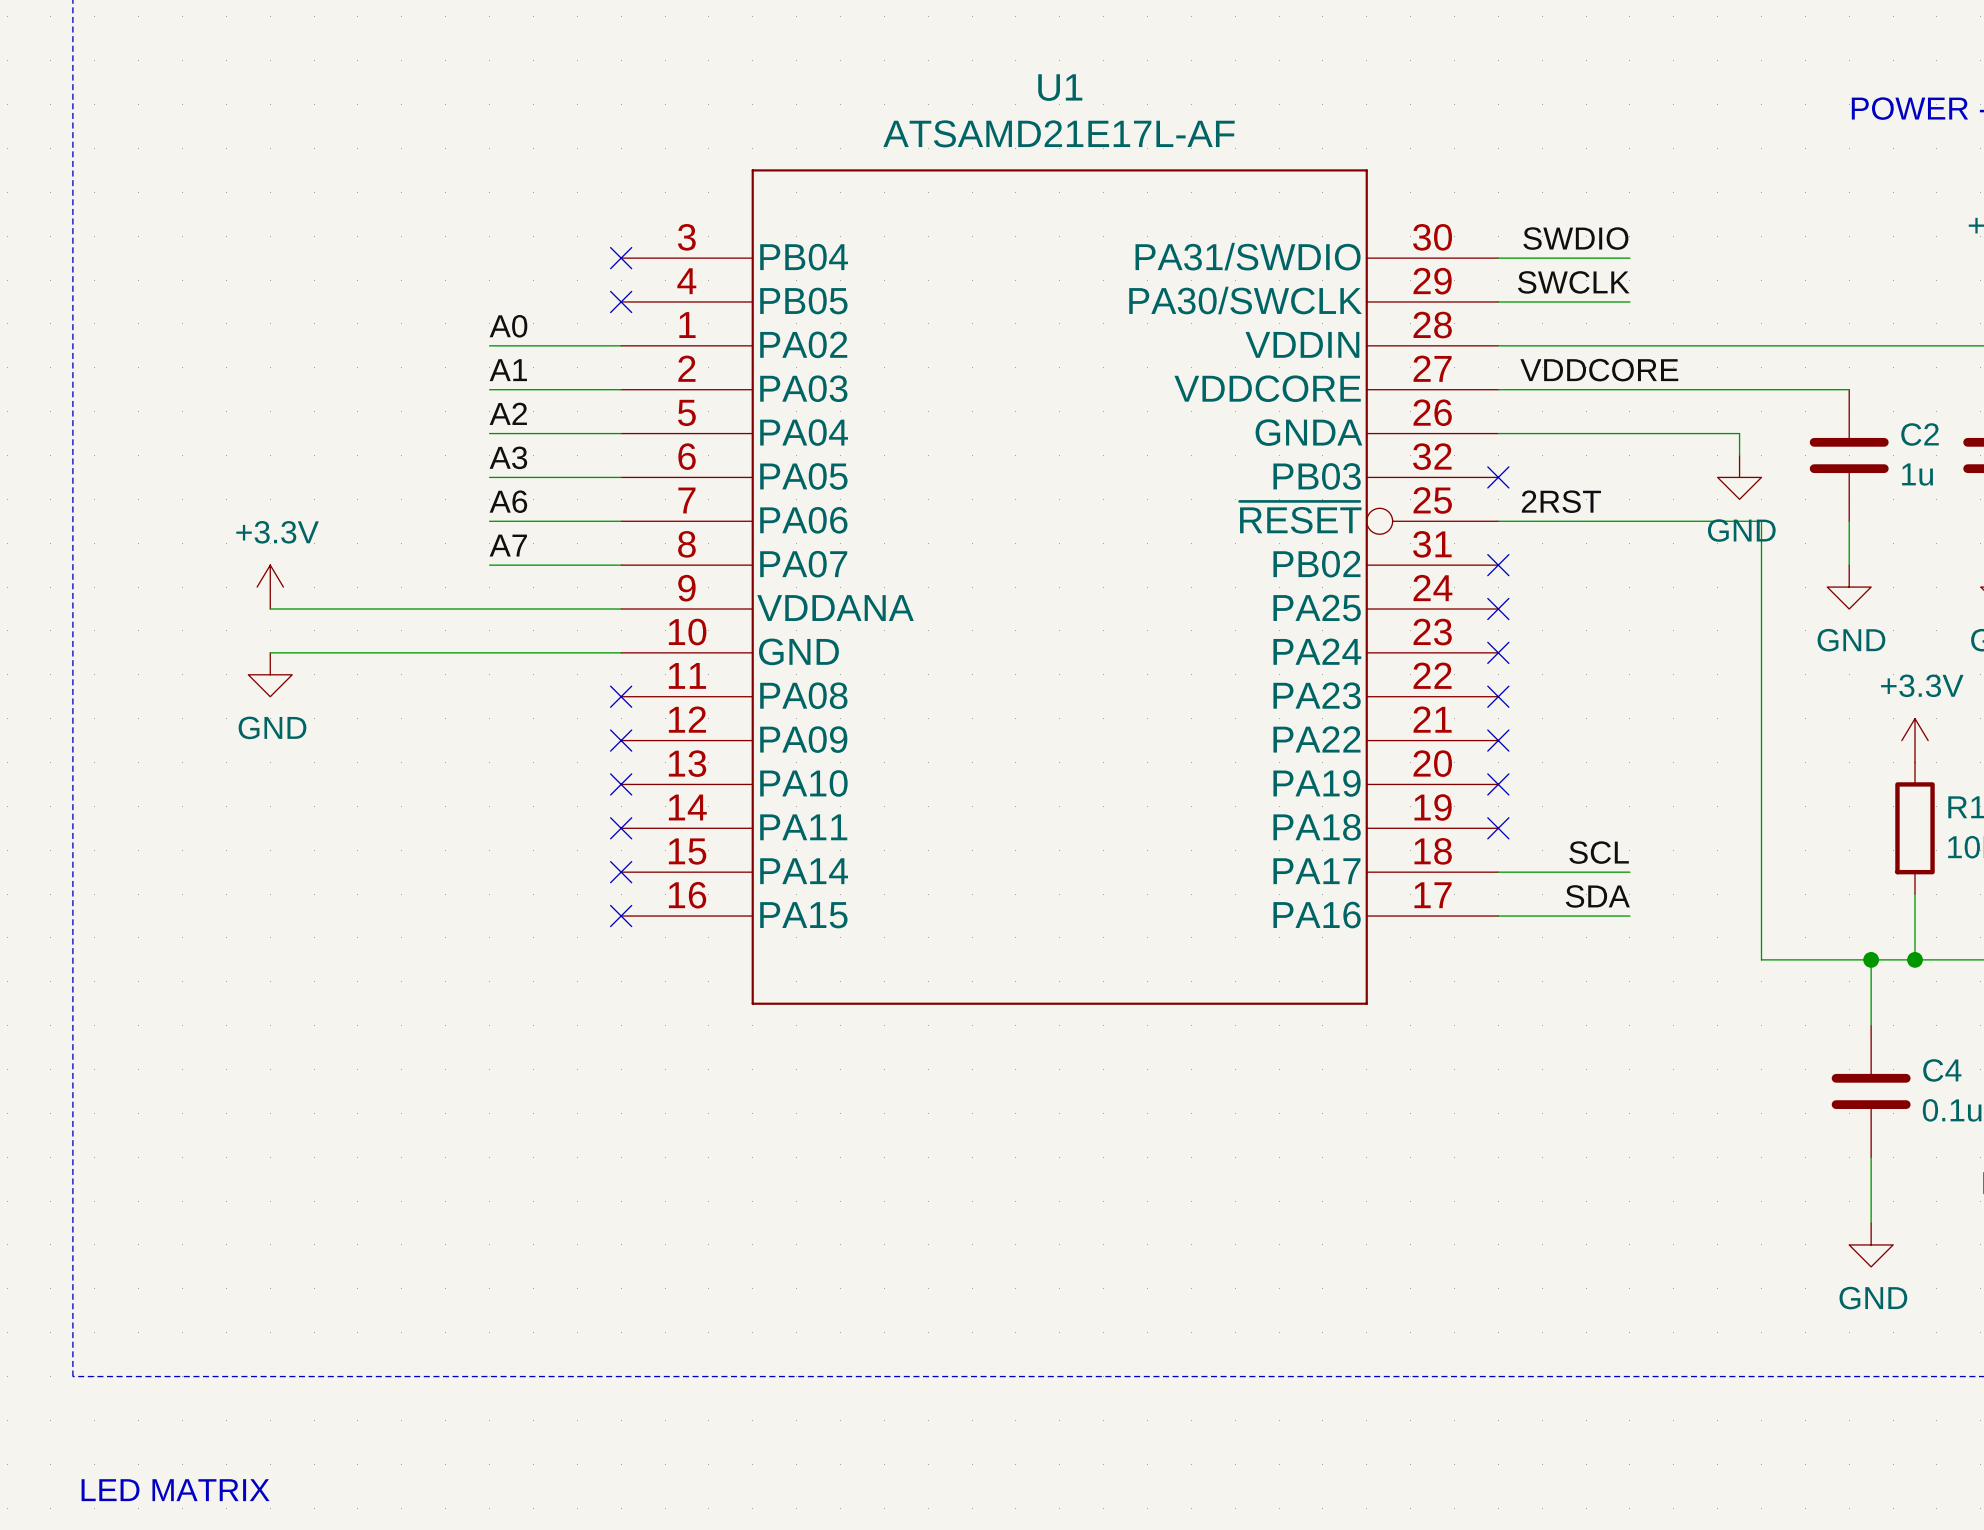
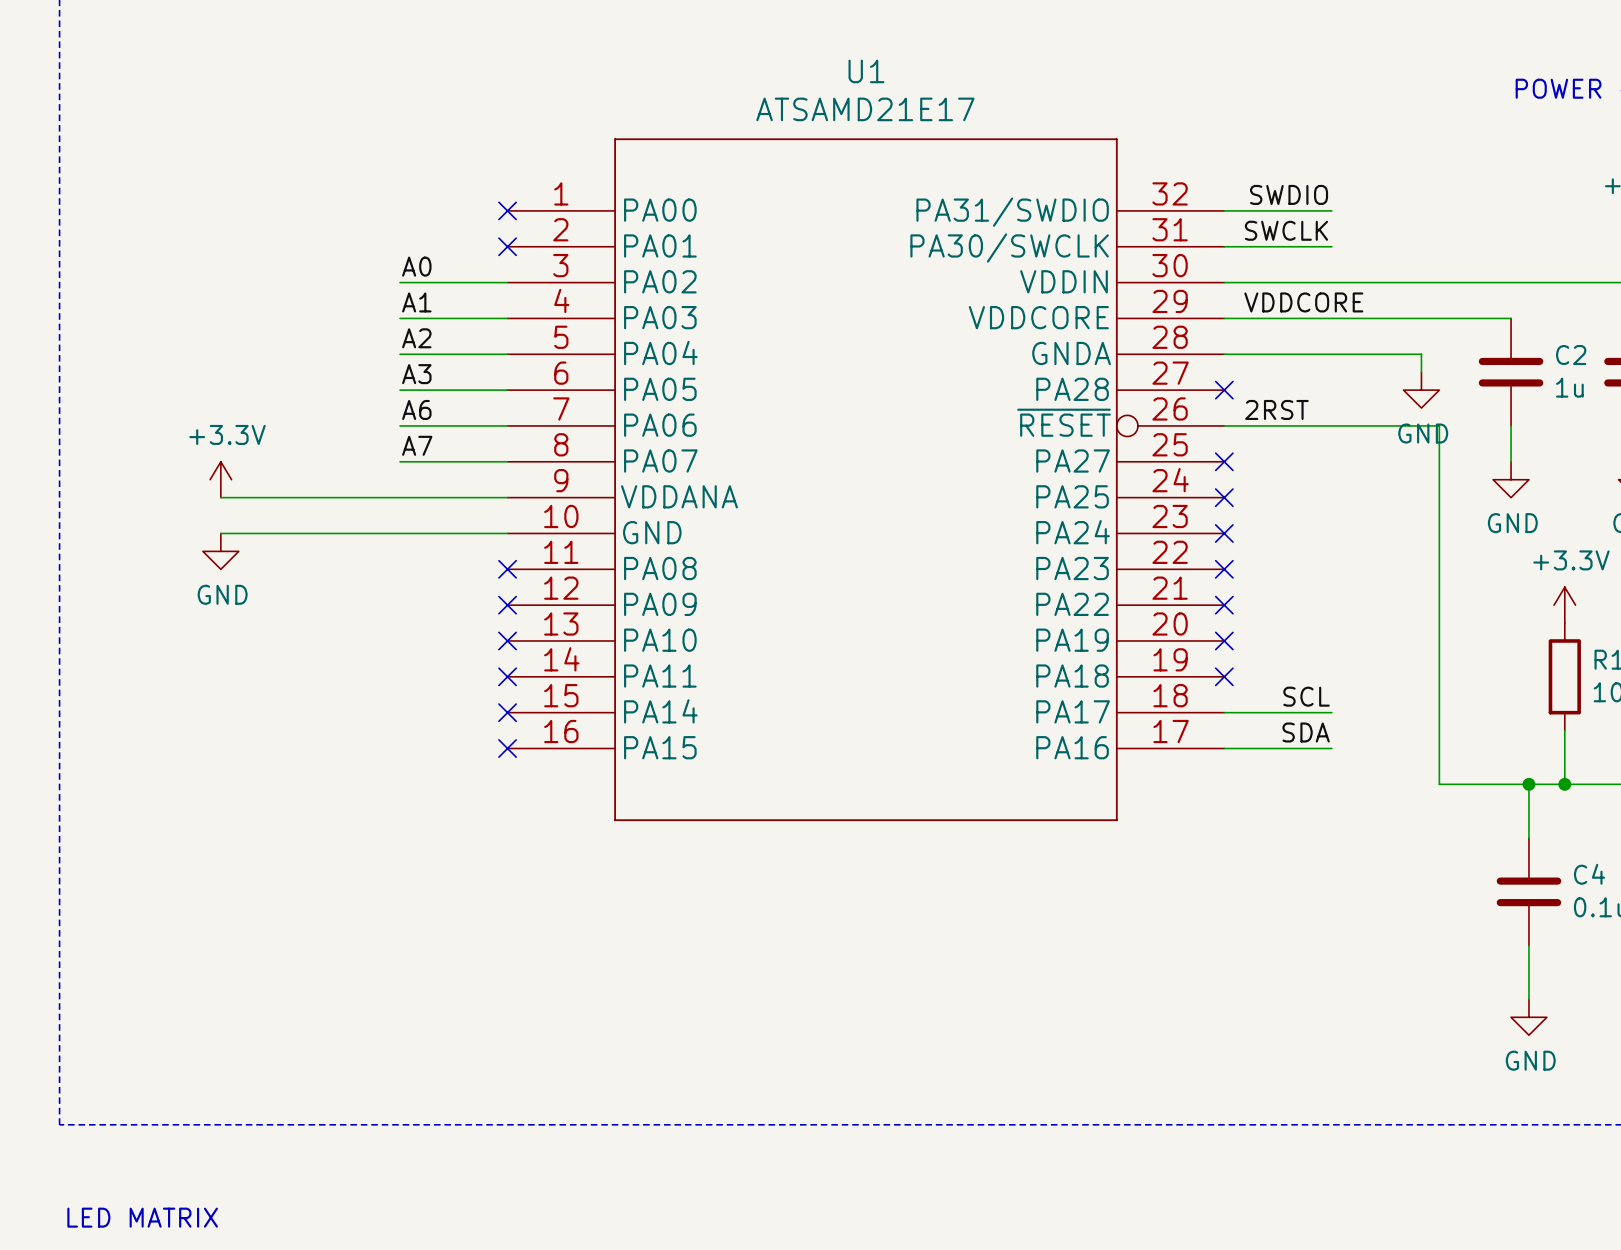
U1 value: ATSAMD21E17L-AF (1059, 133) -> ATSAMD21E17 (865, 109)
U1 symbol: [621, 169, 1499, 1005] -> [507, 138, 1225, 822]

